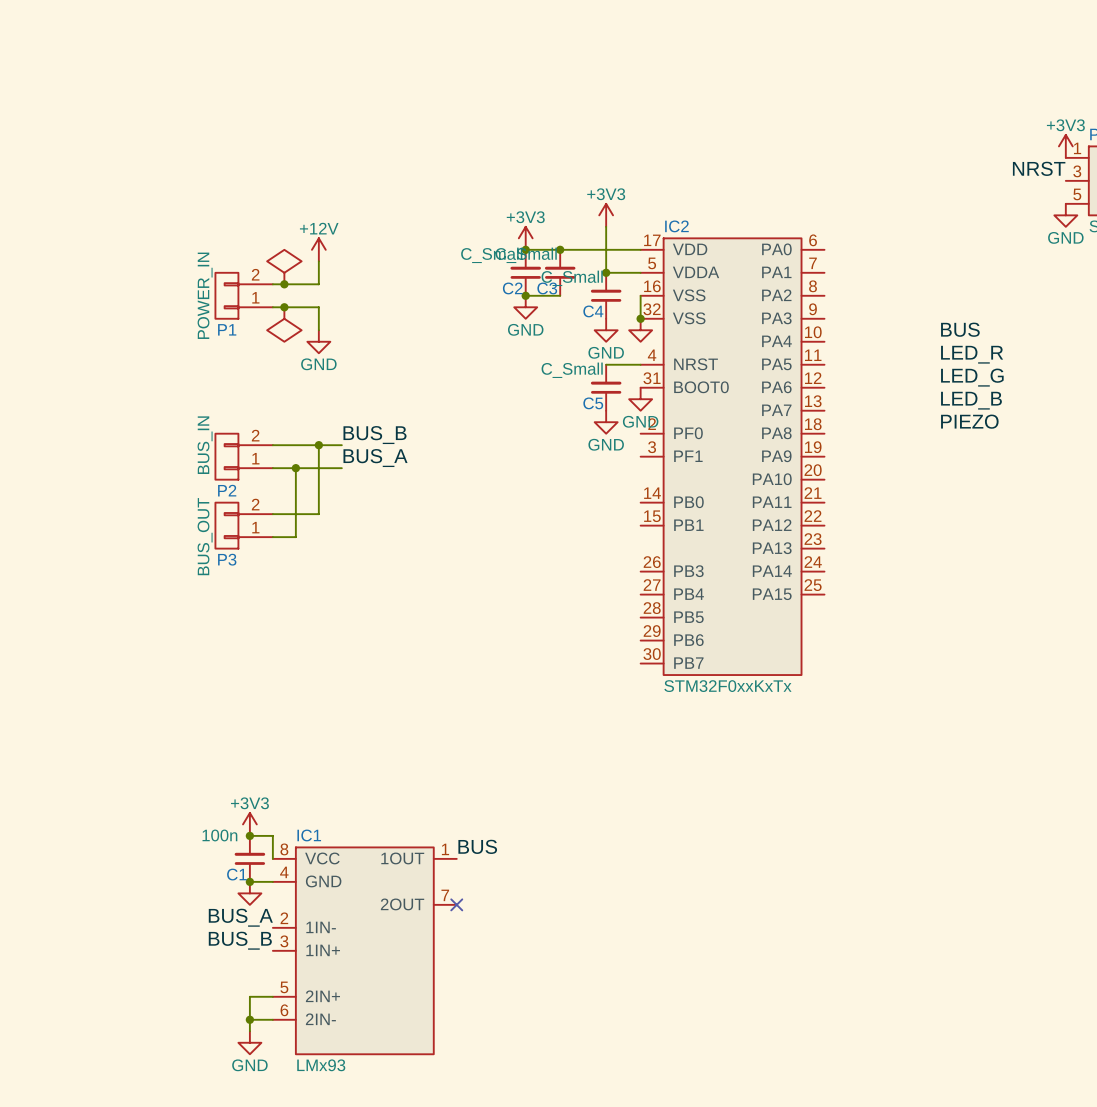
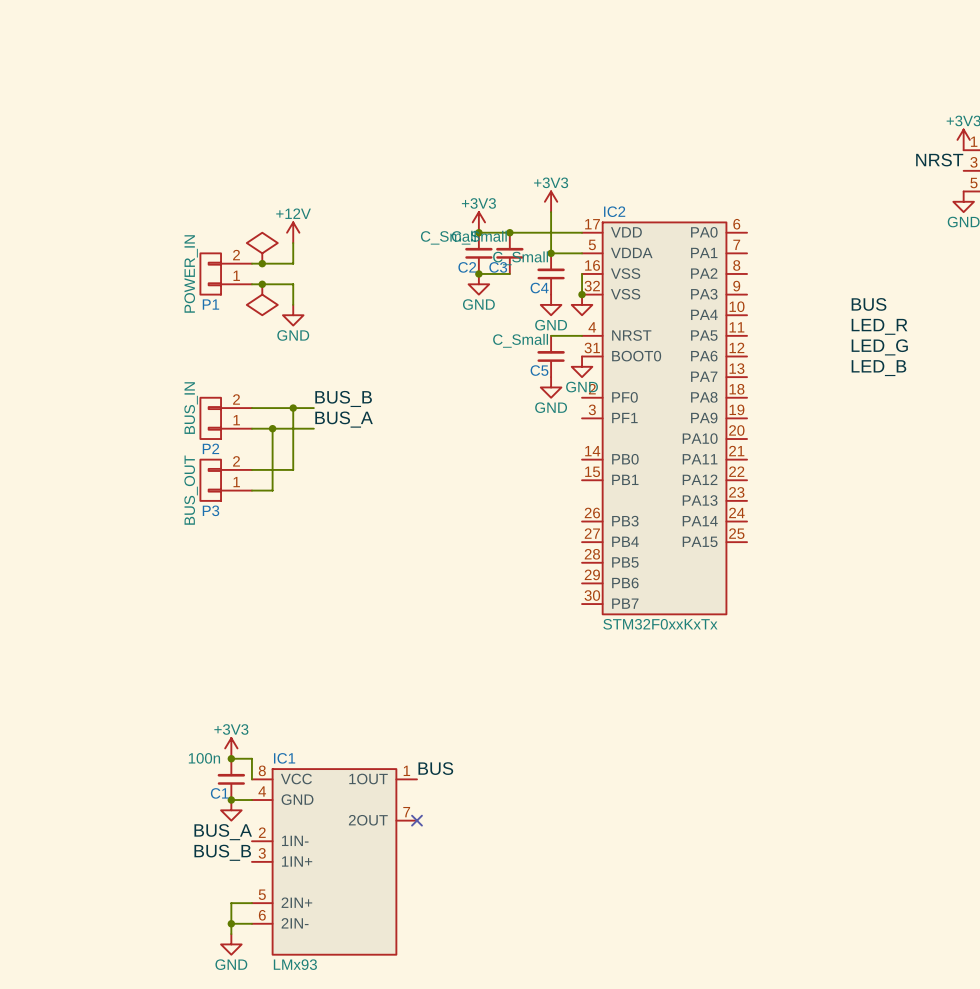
label: PIEZO (969, 421) -> none

